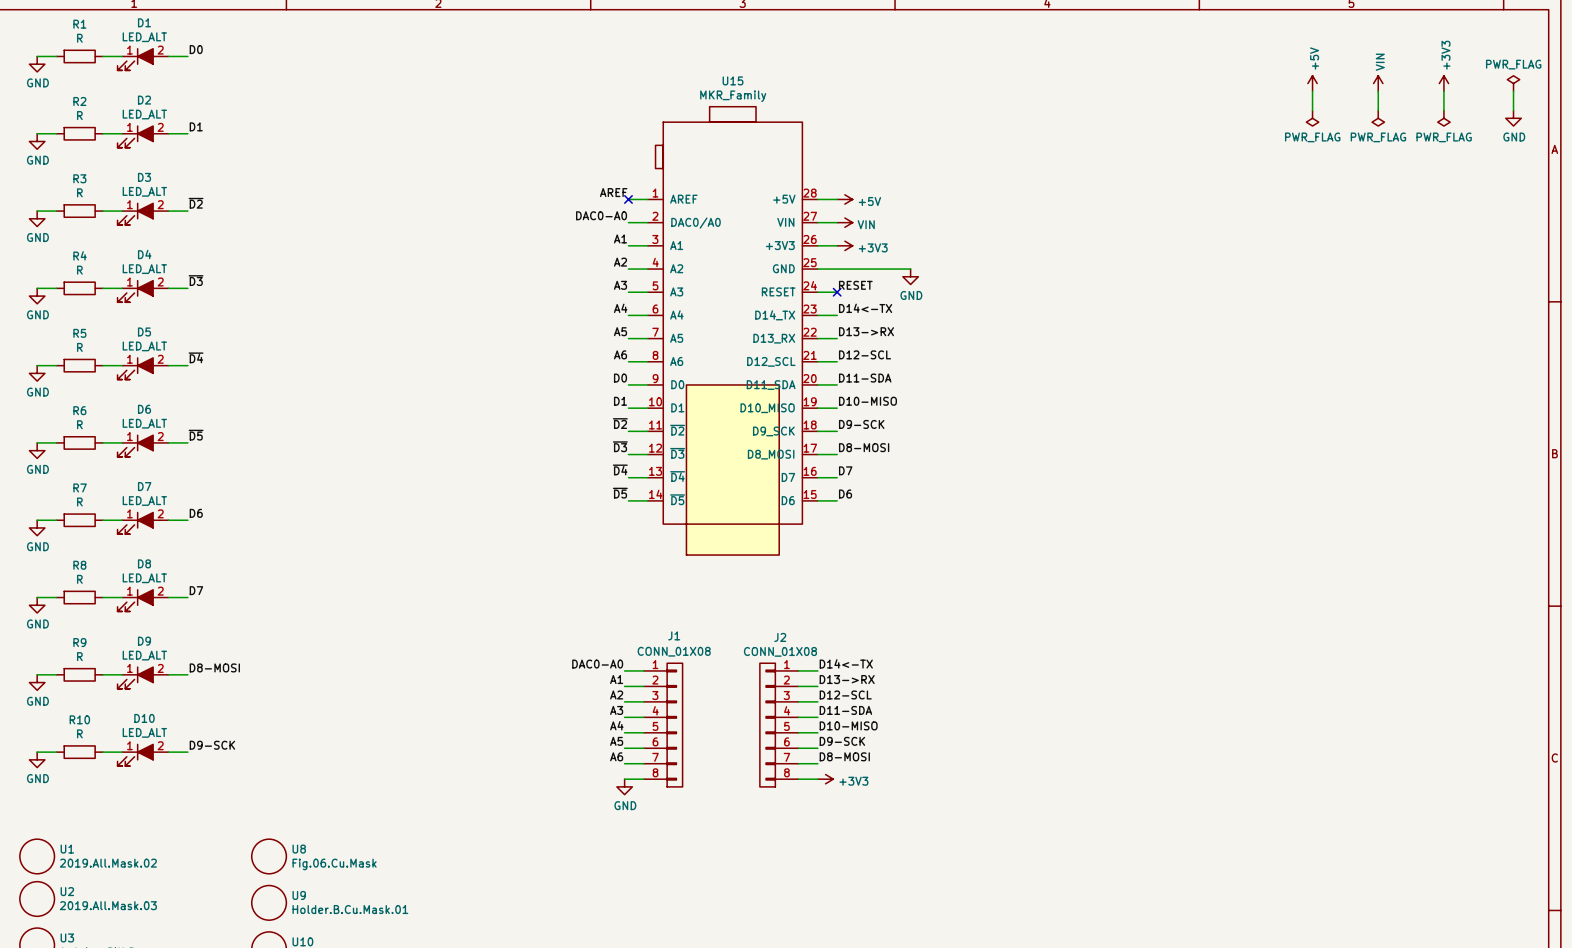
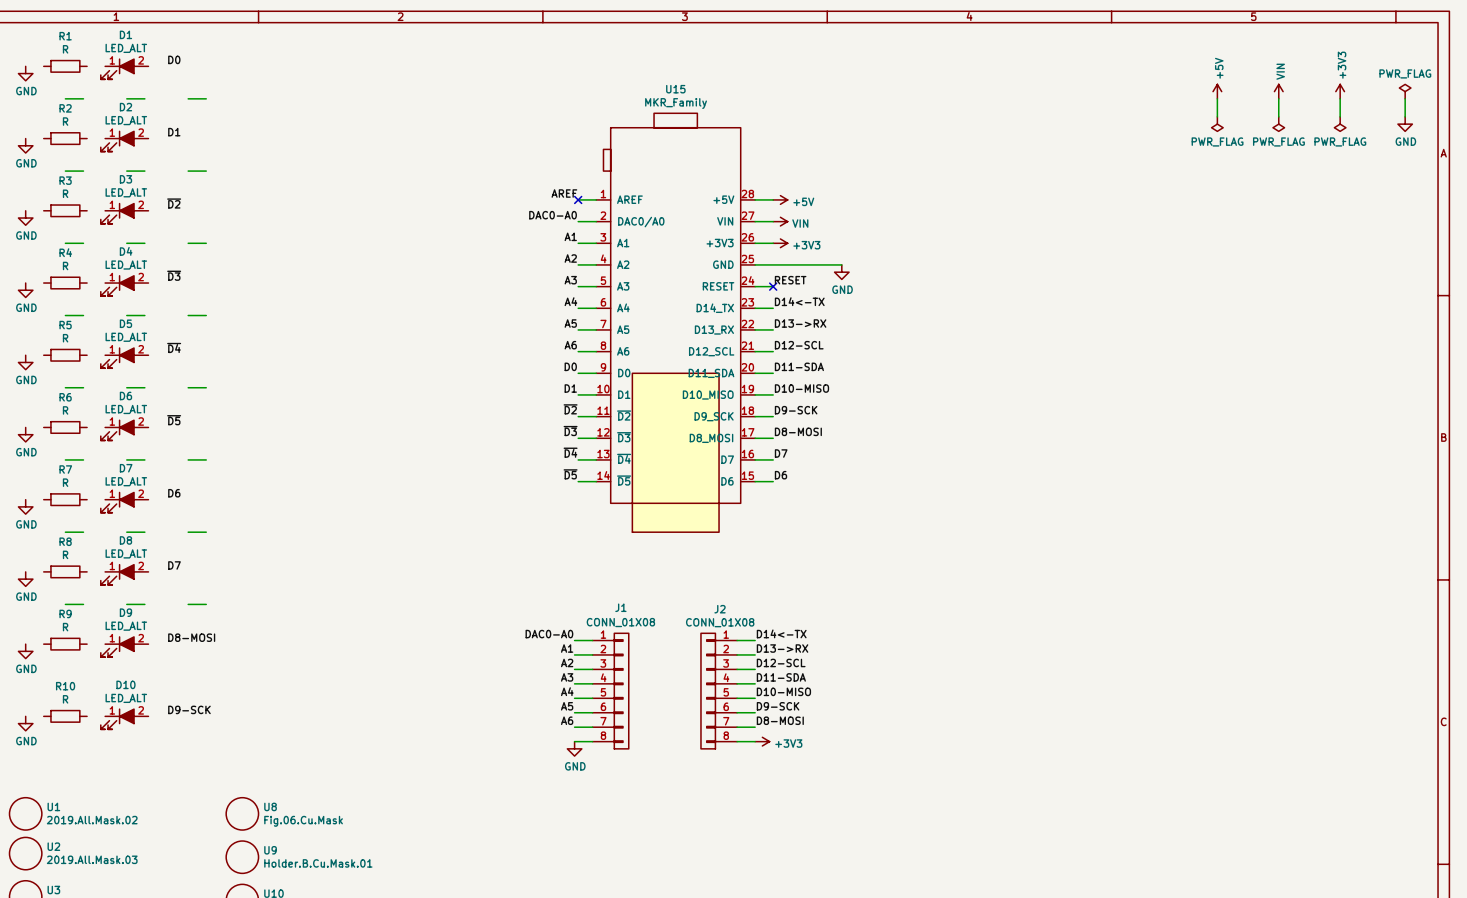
wire: (37, 56) (56, 56) -> (65, 98) (83, 98)
wire: (102, 56) (122, 56) -> (126, 98) (144, 98)
wire: (168, 56) (187, 56) -> (188, 98) (206, 98)
wire: (37, 133) (56, 133) -> (65, 171) (83, 171)
wire: (102, 133) (122, 133) -> (126, 171) (144, 171)
wire: (168, 133) (187, 133) -> (188, 171) (206, 171)
wire: (37, 211) (56, 211) -> (65, 243) (83, 243)
wire: (102, 211) (122, 211) -> (126, 243) (144, 243)
wire: (168, 211) (187, 211) -> (188, 243) (206, 243)
wire: (37, 288) (56, 288) -> (65, 315) (83, 315)
wire: (102, 288) (122, 288) -> (126, 315) (144, 315)
wire: (168, 288) (187, 288) -> (188, 315) (206, 315)
wire: (37, 365) (56, 365) -> (65, 387) (83, 387)
wire: (102, 365) (122, 365) -> (126, 387) (144, 387)
wire: (168, 365) (187, 365) -> (188, 387) (206, 387)
wire: (37, 442) (56, 442) -> (65, 459) (83, 459)
wire: (102, 442) (122, 442) -> (126, 459) (144, 459)
wire: (168, 442) (187, 442) -> (188, 459) (206, 459)
wire: (37, 520) (56, 520) -> (65, 532) (83, 532)
wire: (102, 520) (122, 520) -> (126, 532) (144, 532)
wire: (168, 520) (187, 520) -> (188, 532) (206, 532)
wire: (37, 597) (56, 597) -> (65, 604) (83, 604)
wire: (102, 597) (122, 597) -> (126, 604) (144, 604)
wire: (168, 597) (187, 597) -> (188, 604) (206, 604)
wire: (37, 674) (56, 674) -> none
wire: (102, 674) (122, 674) -> none
wire: (168, 674) (187, 674) -> none
wire: (37, 752) (56, 752) -> none
wire: (102, 752) (122, 752) -> none
wire: (168, 752) (187, 752) -> none

